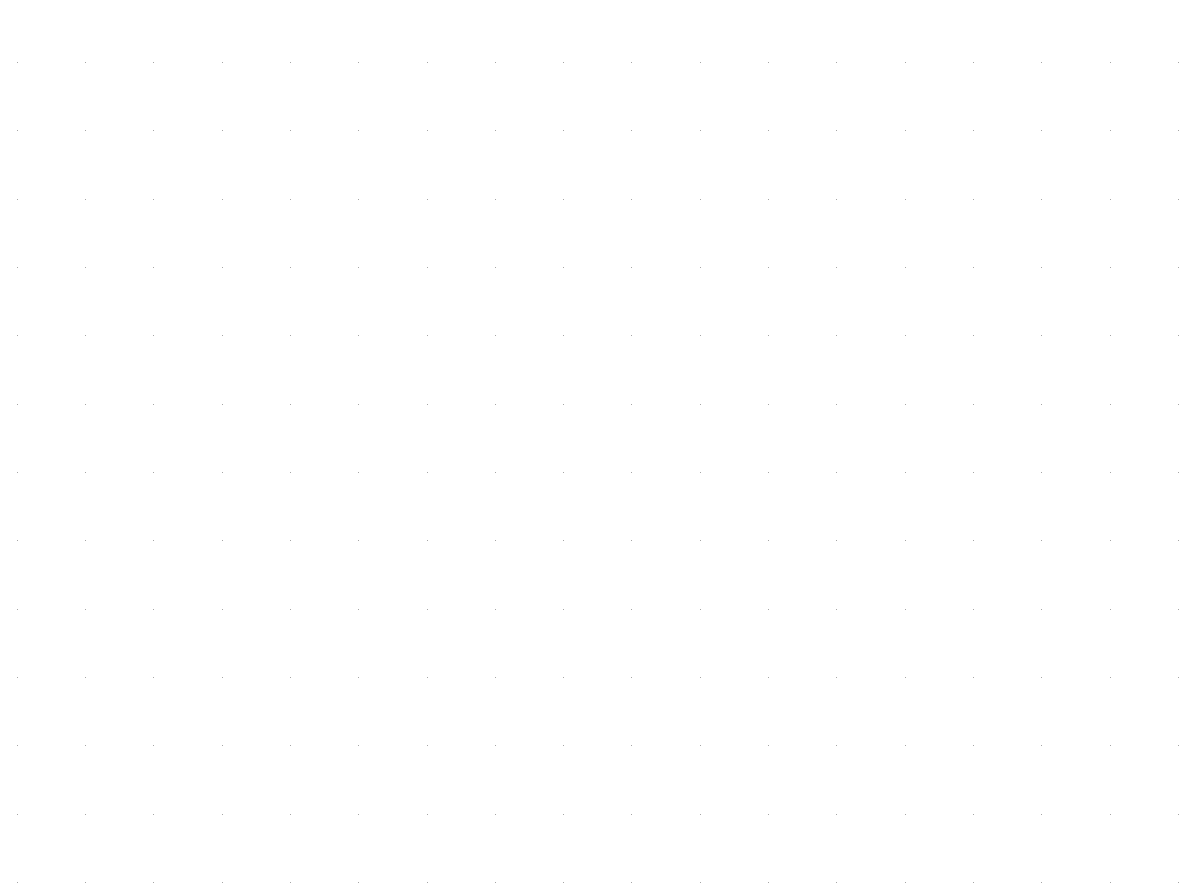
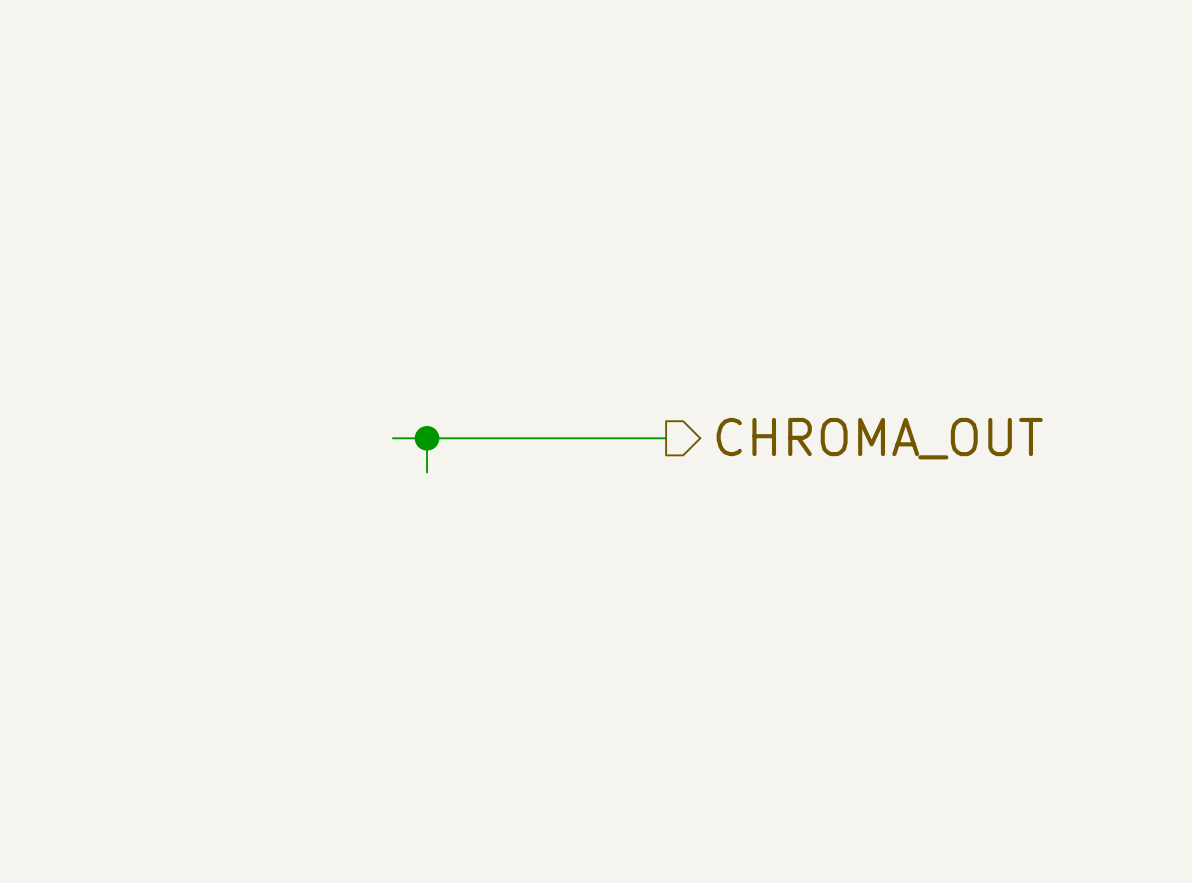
wire: none -> (392, 438) (666, 438)
wire: none -> (427, 438) (427, 472)
junction: none -> (427, 438)
hierarchical label: none -> CHROMA_OUT (879, 438)

